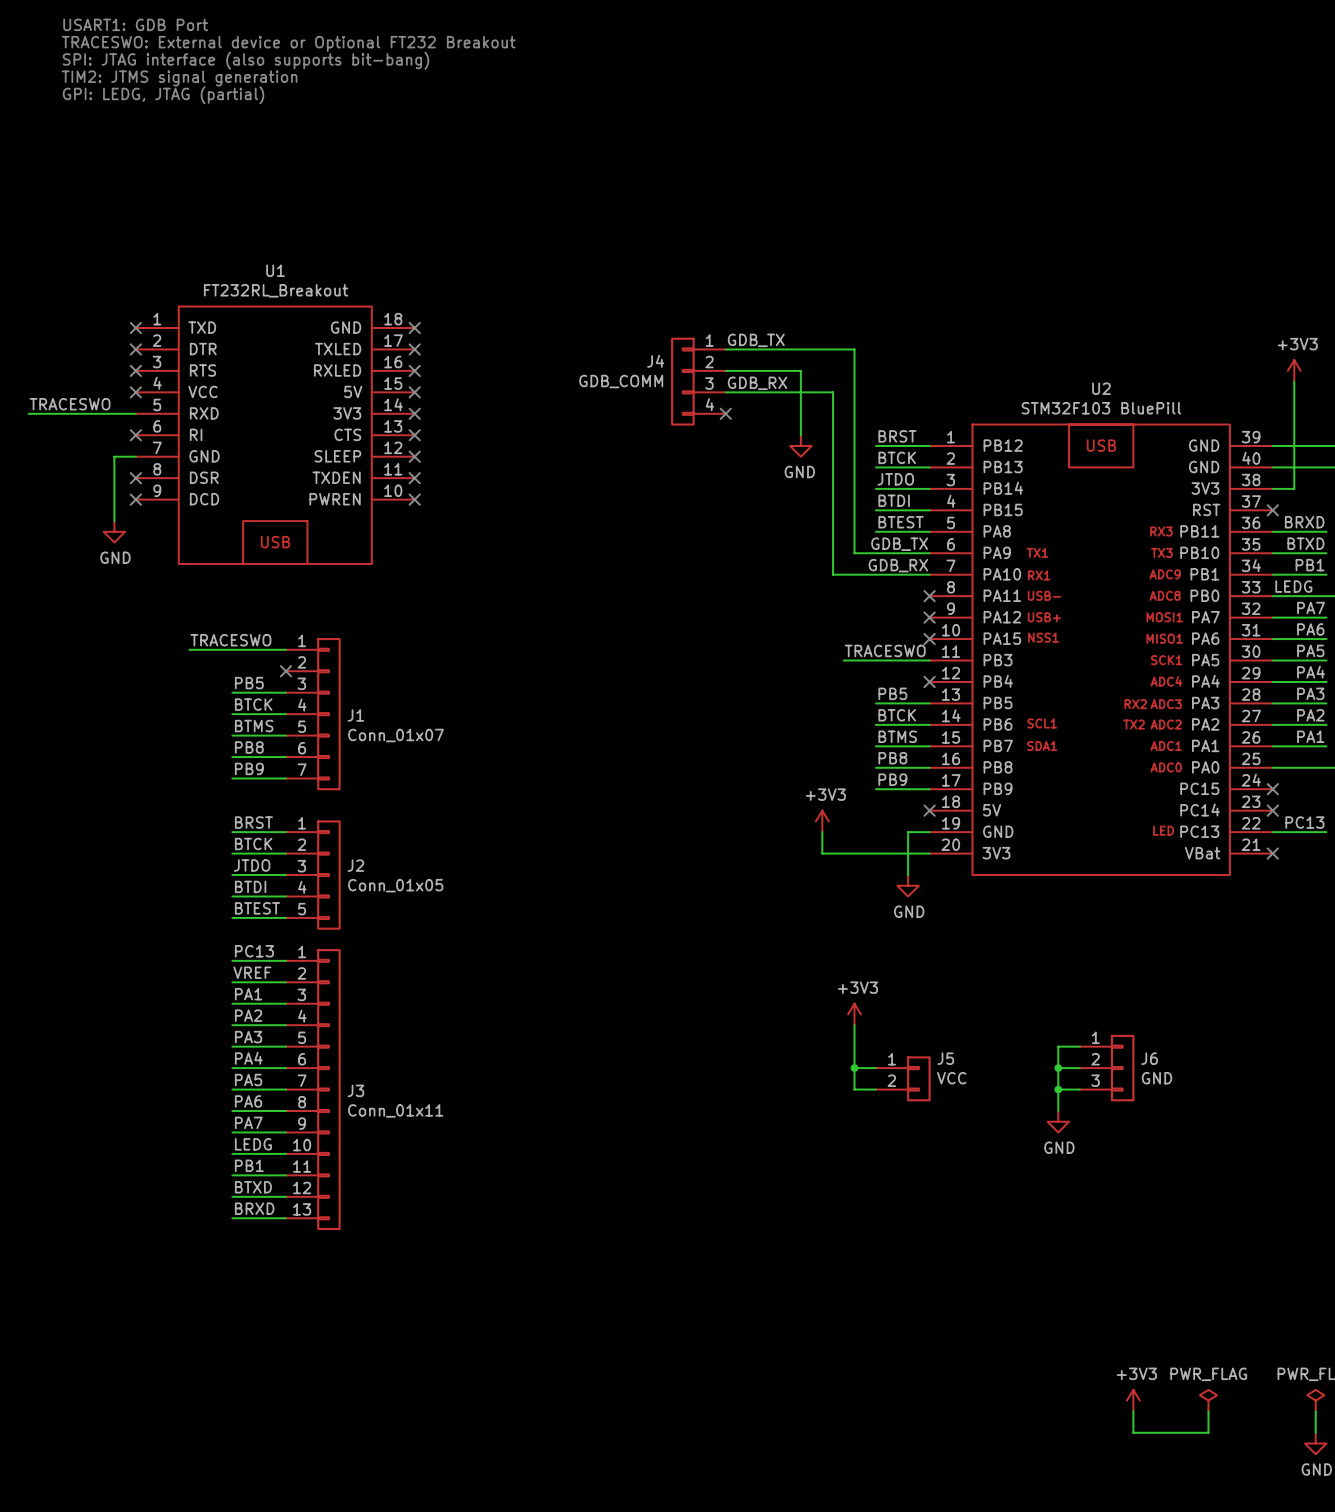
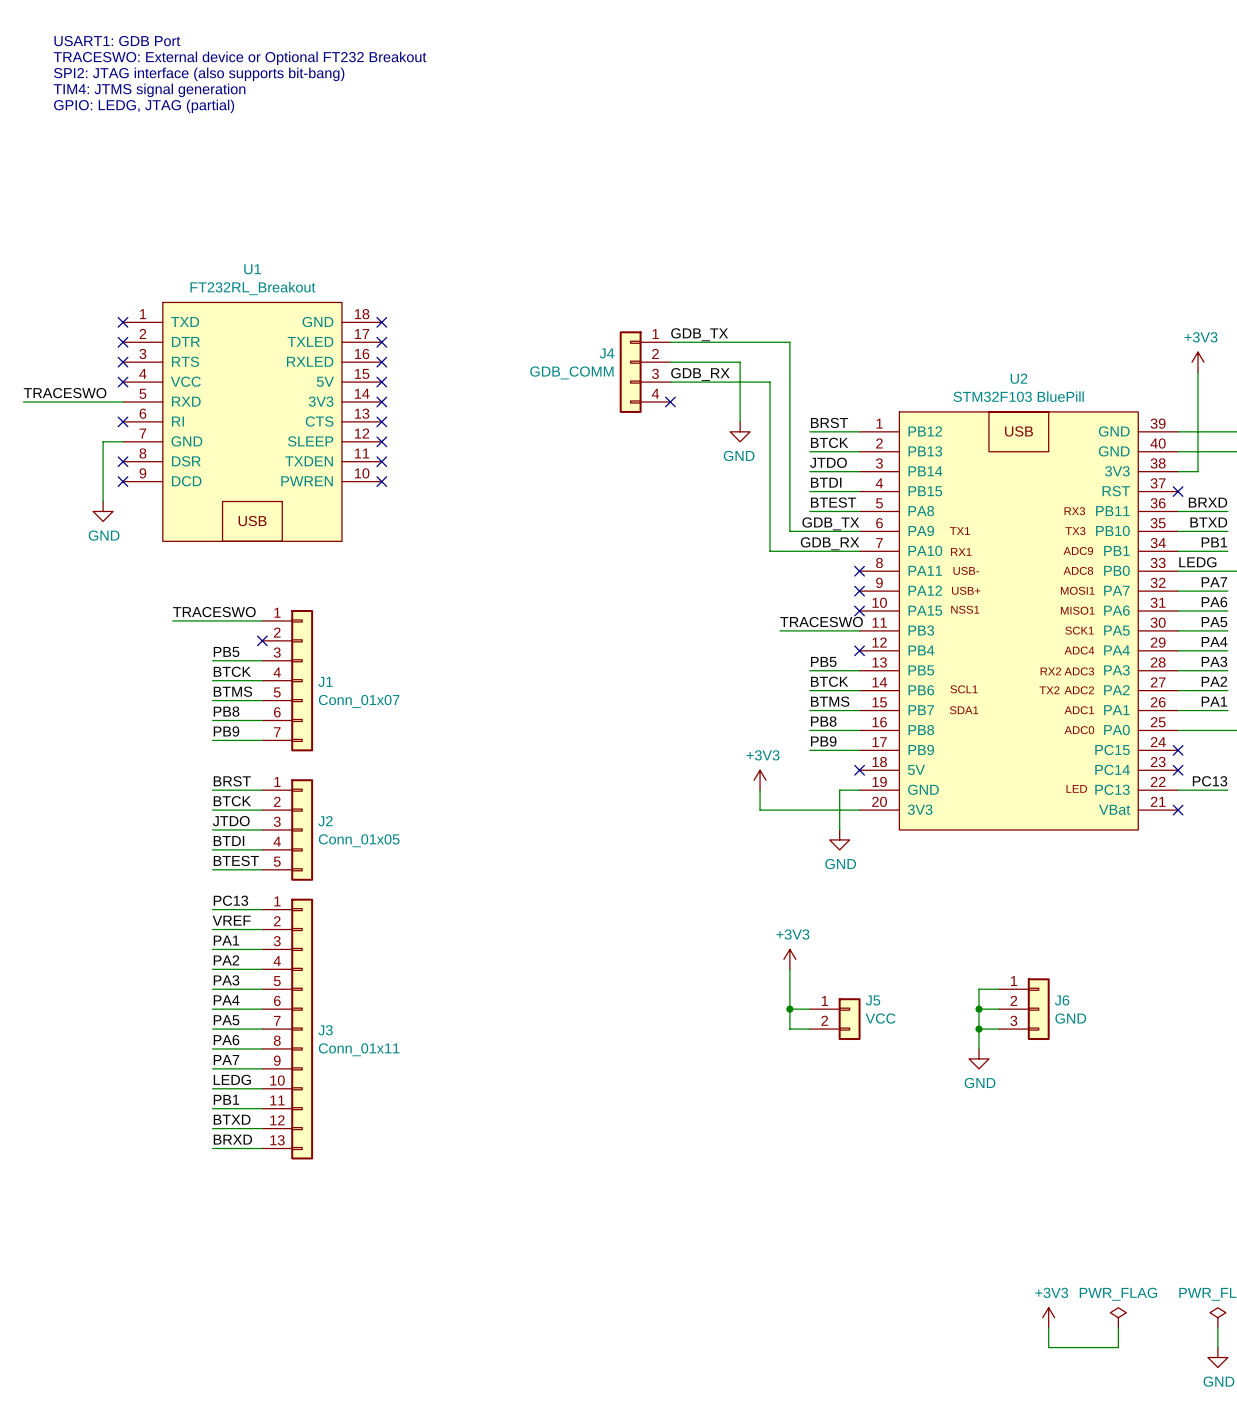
text: SPI: JTAG interface (also supports bit-bang) (246, 60) -> SPI2: JTAG interface (also supports bit-bang) (199, 74)
text: TIM2: JTMS signal generation (179, 78) -> TIM4: JTMS signal generation (149, 90)
text: GPI: LEDG, JTAG (partial) (163, 95) -> GPIO: LEDG, JTAG (partial) (144, 106)

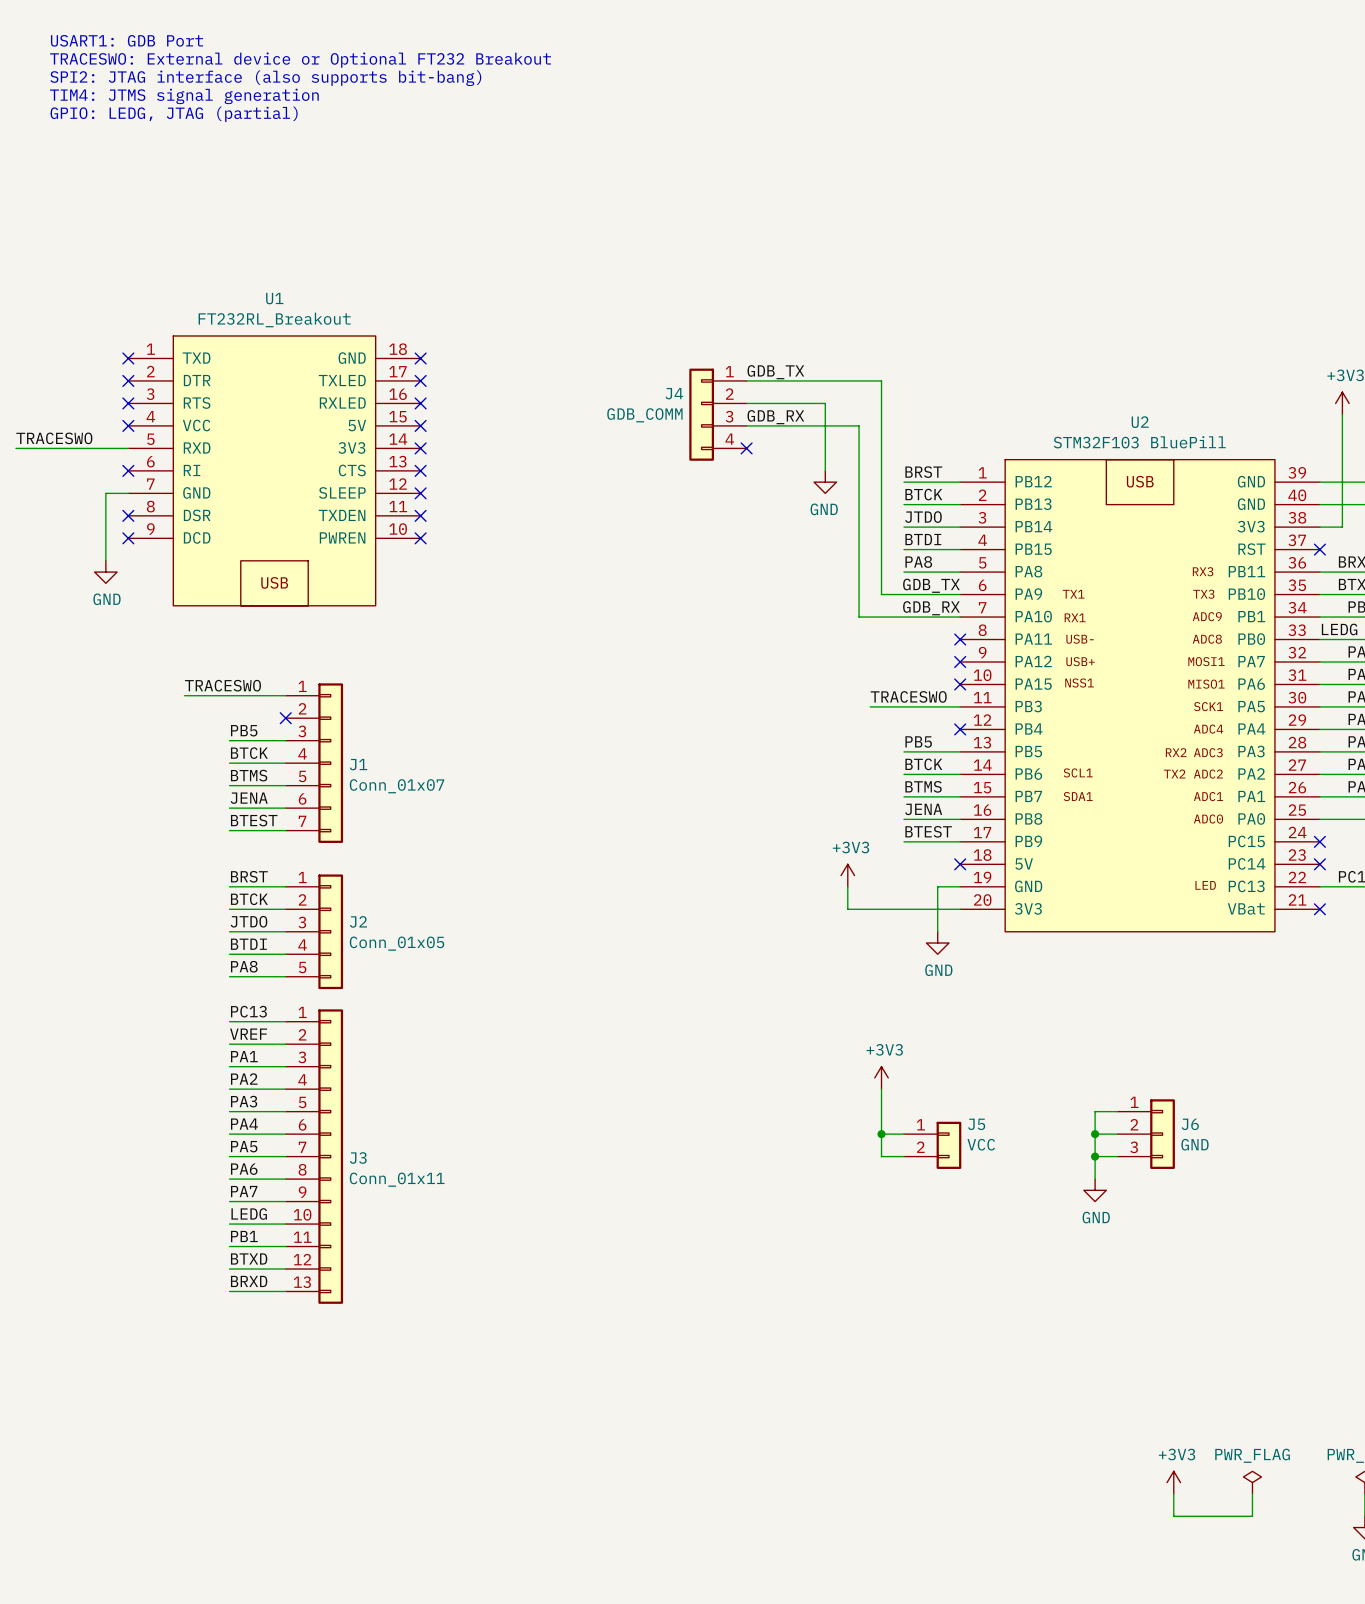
label: BTEST (833, 502) -> PA8 (918, 562)
label: PB8 (226, 711) -> JENA (249, 798)
label: PB8 (823, 721) -> JENA (923, 809)
label: PB9 (226, 731) -> BTEST (254, 820)
label: PB9 (823, 741) -> BTEST (928, 831)
label: BTEST (236, 860) -> PA8 (244, 966)

